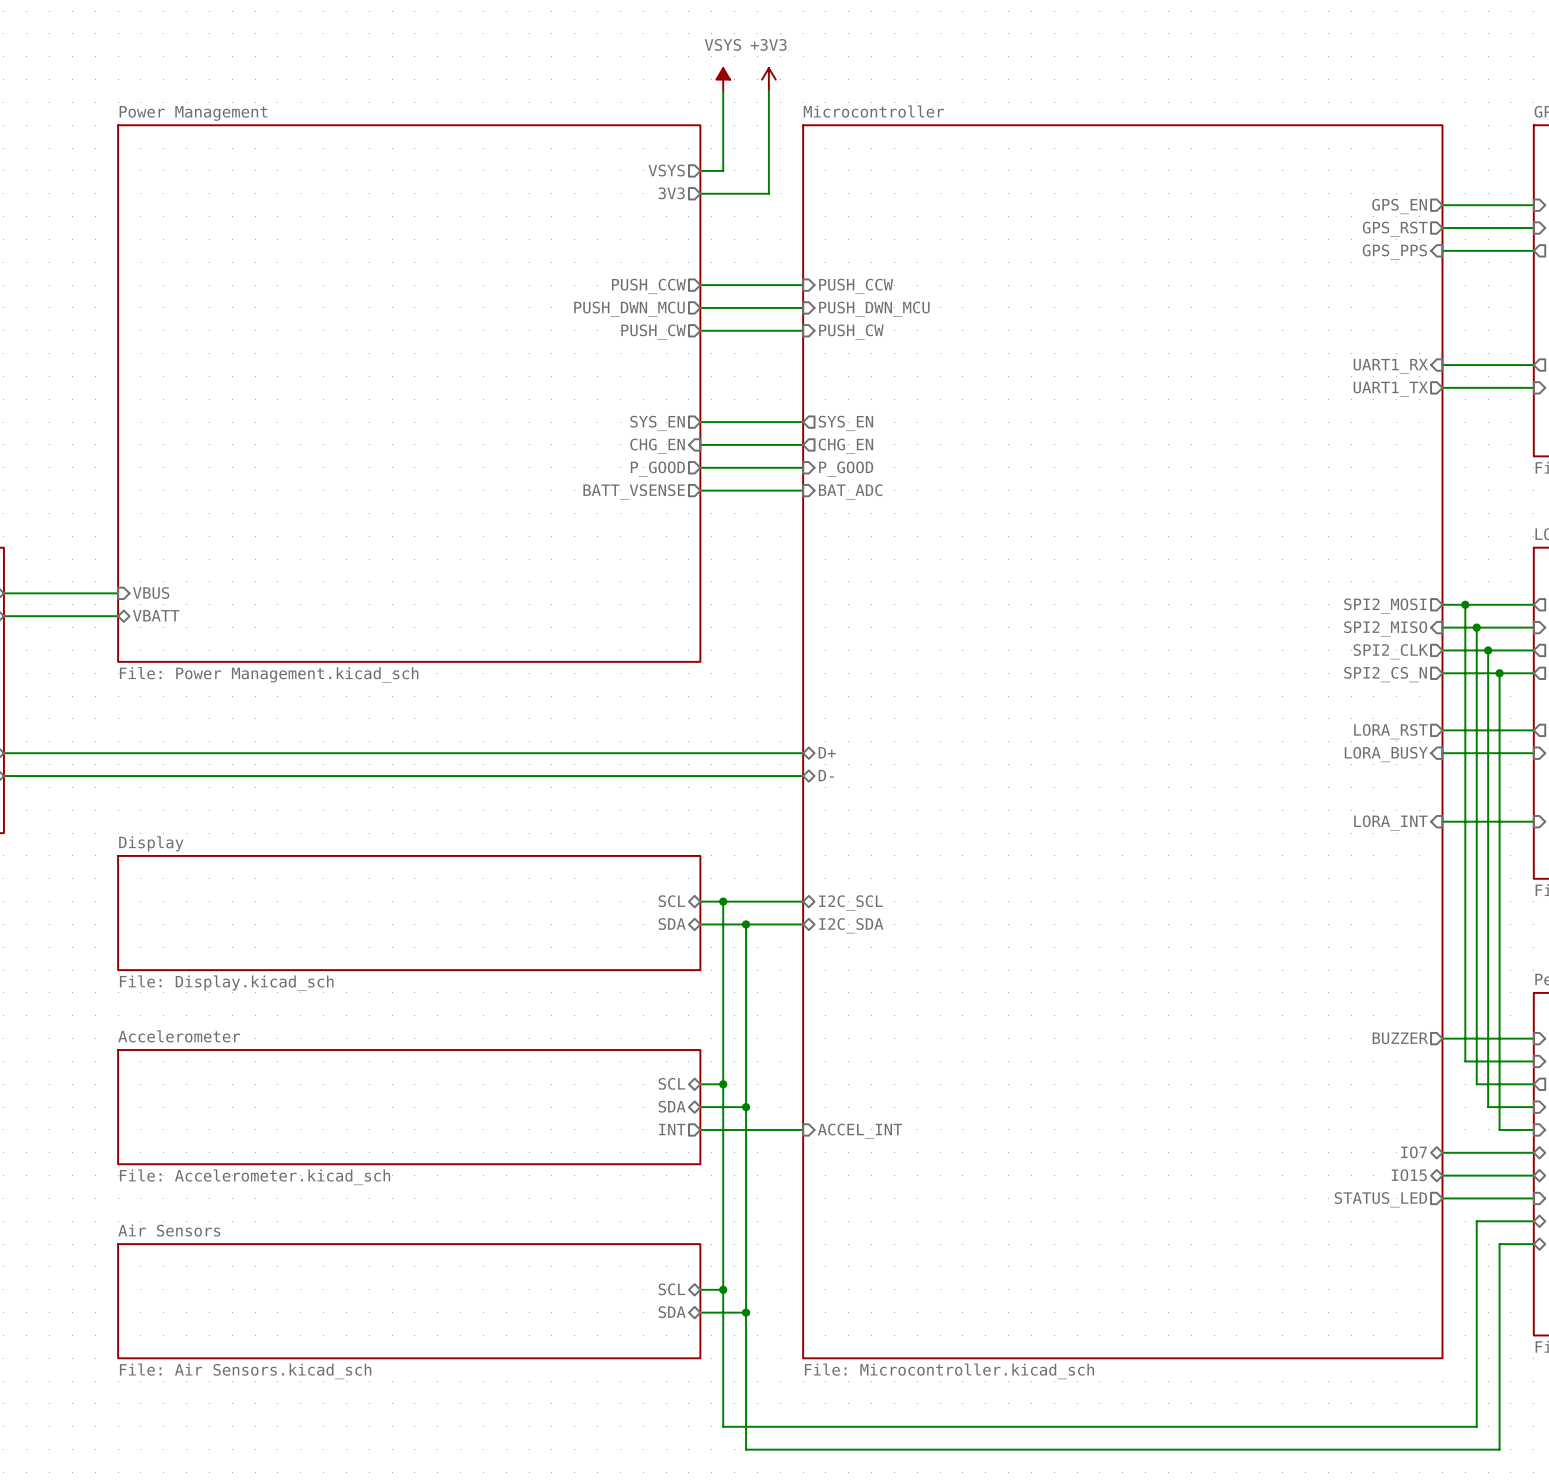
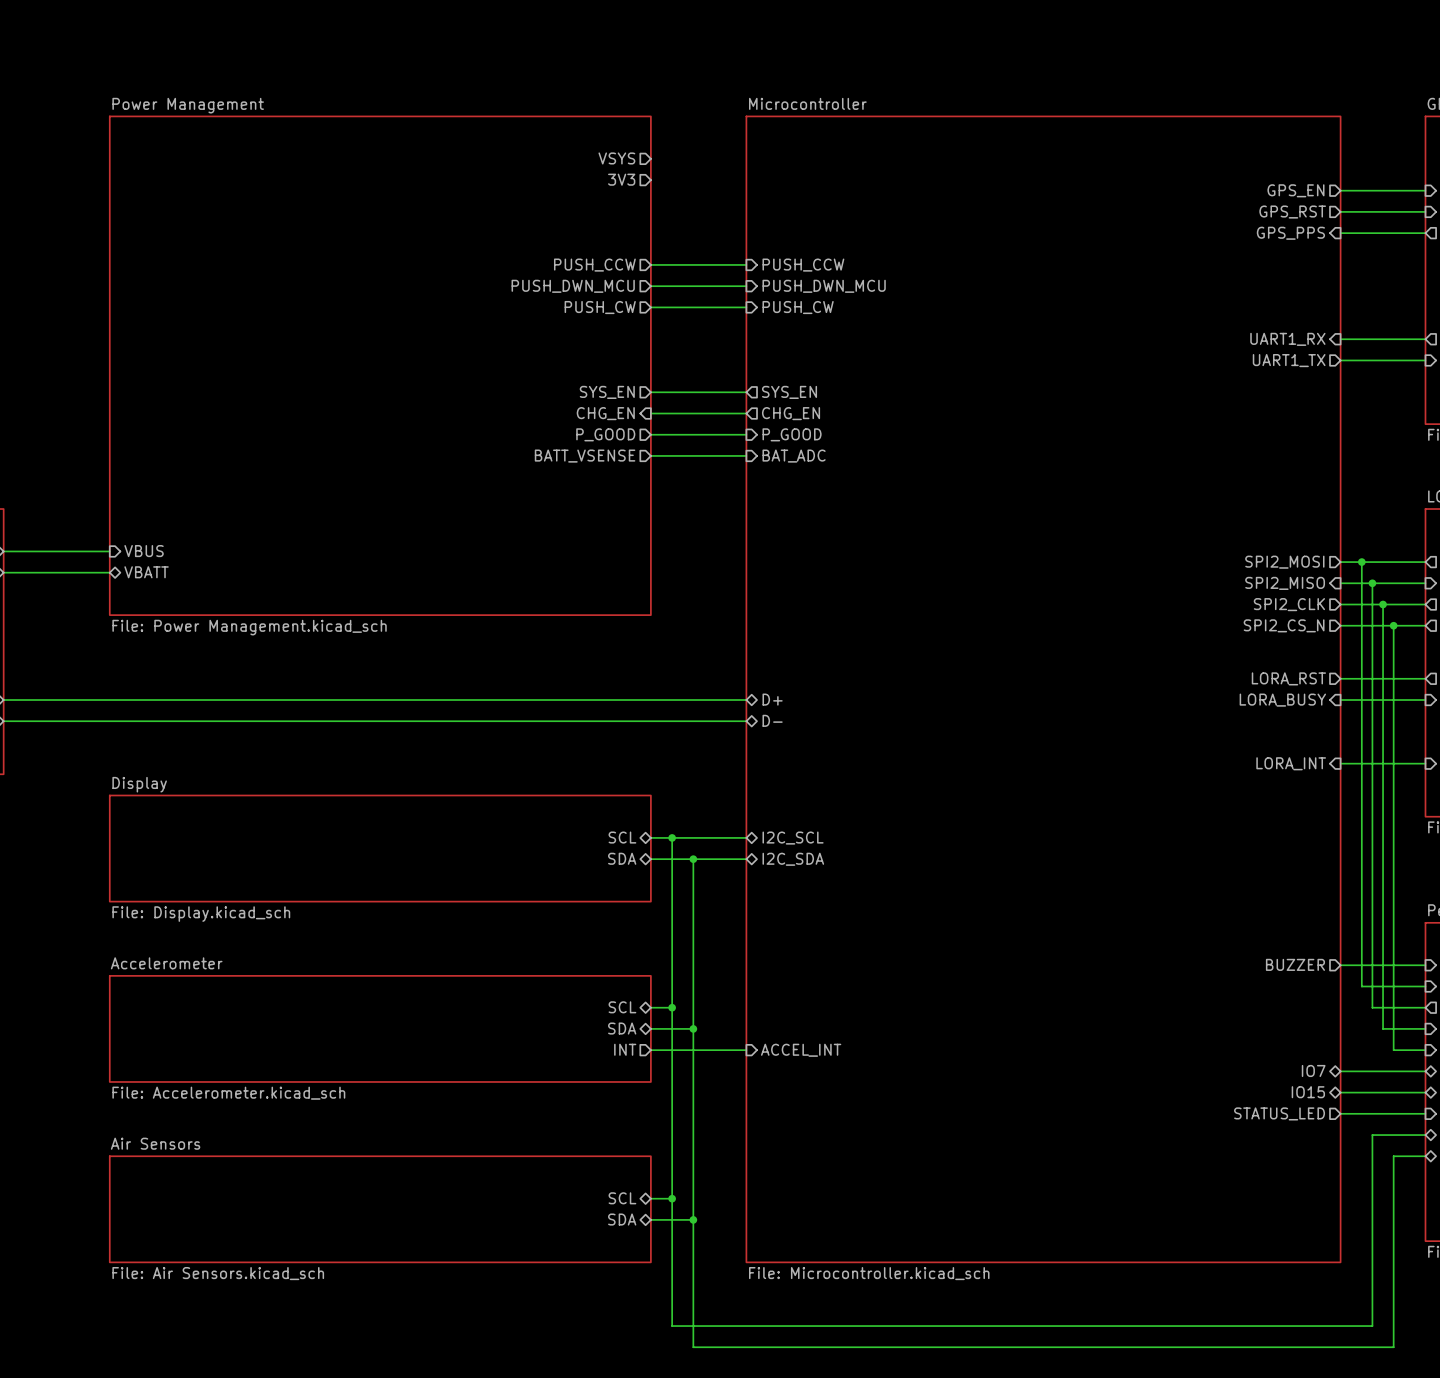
power symbol: VSYS (723, 79) -> none
power symbol: +3V3 (768, 79) -> none
wire: (723, 91) (723, 170) (700, 170) -> none
wire: (768, 91) (768, 193) (700, 193) -> none

